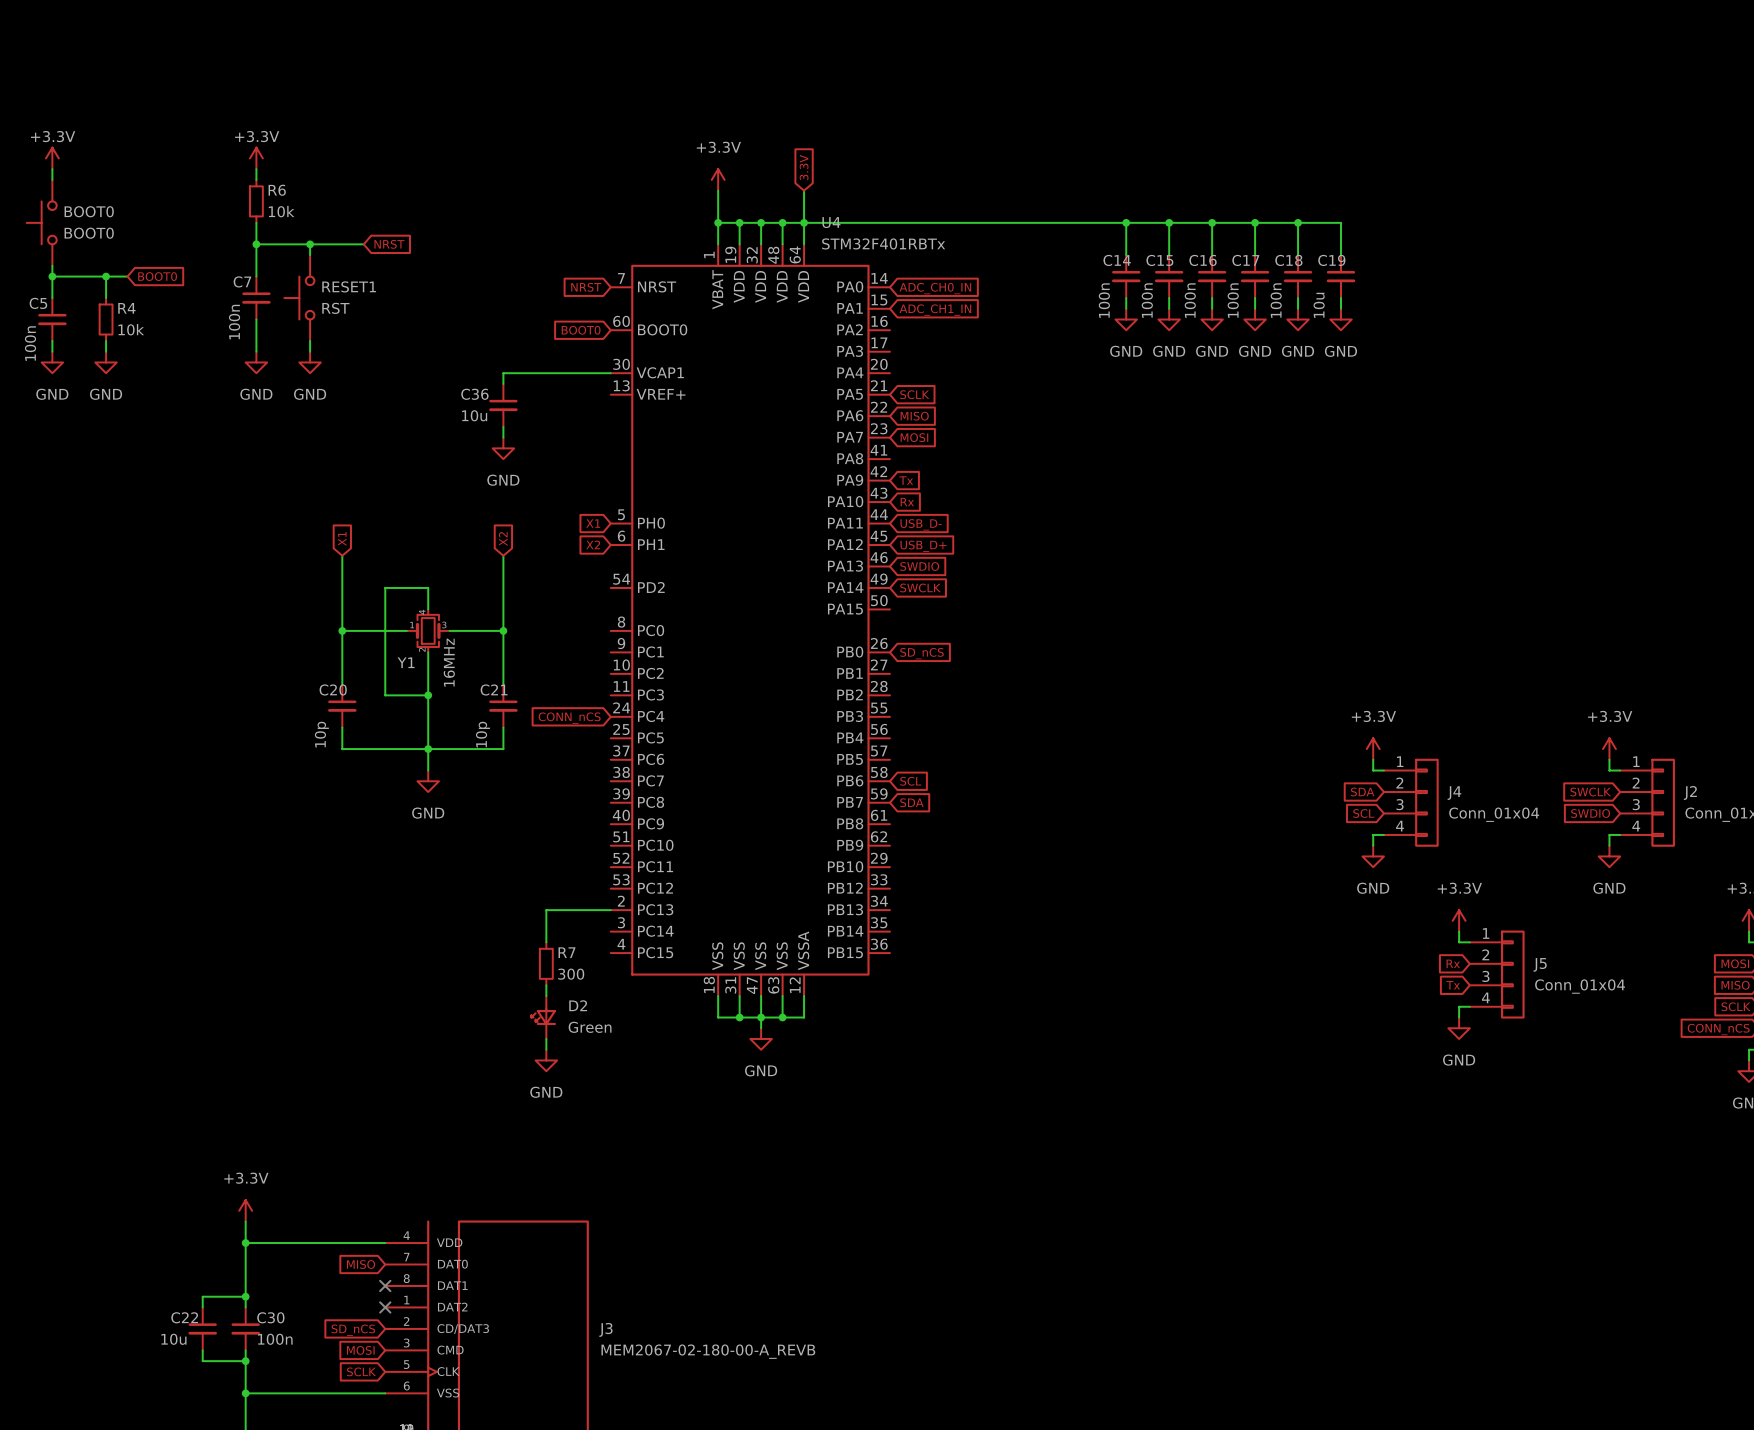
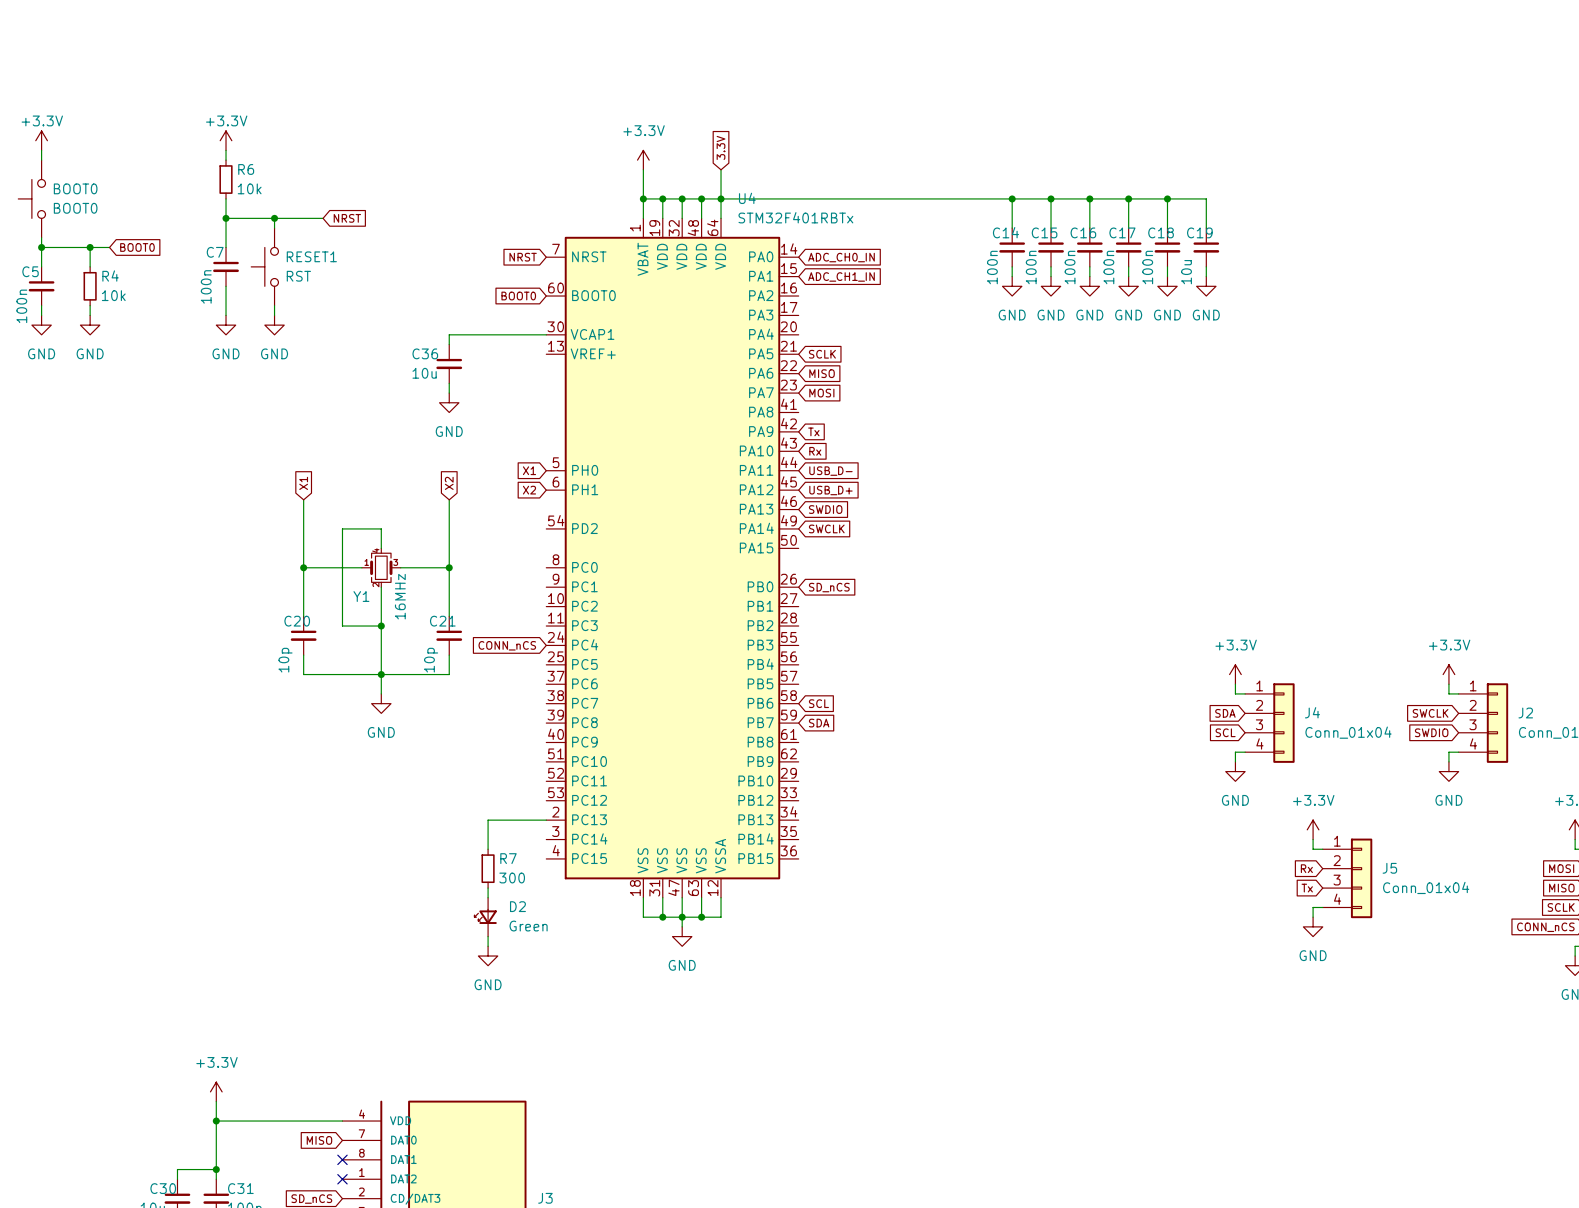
C22 name: C22 (184, 1317) -> C30 (163, 1188)
C30 name: C30 (270, 1317) -> C31 (240, 1188)

